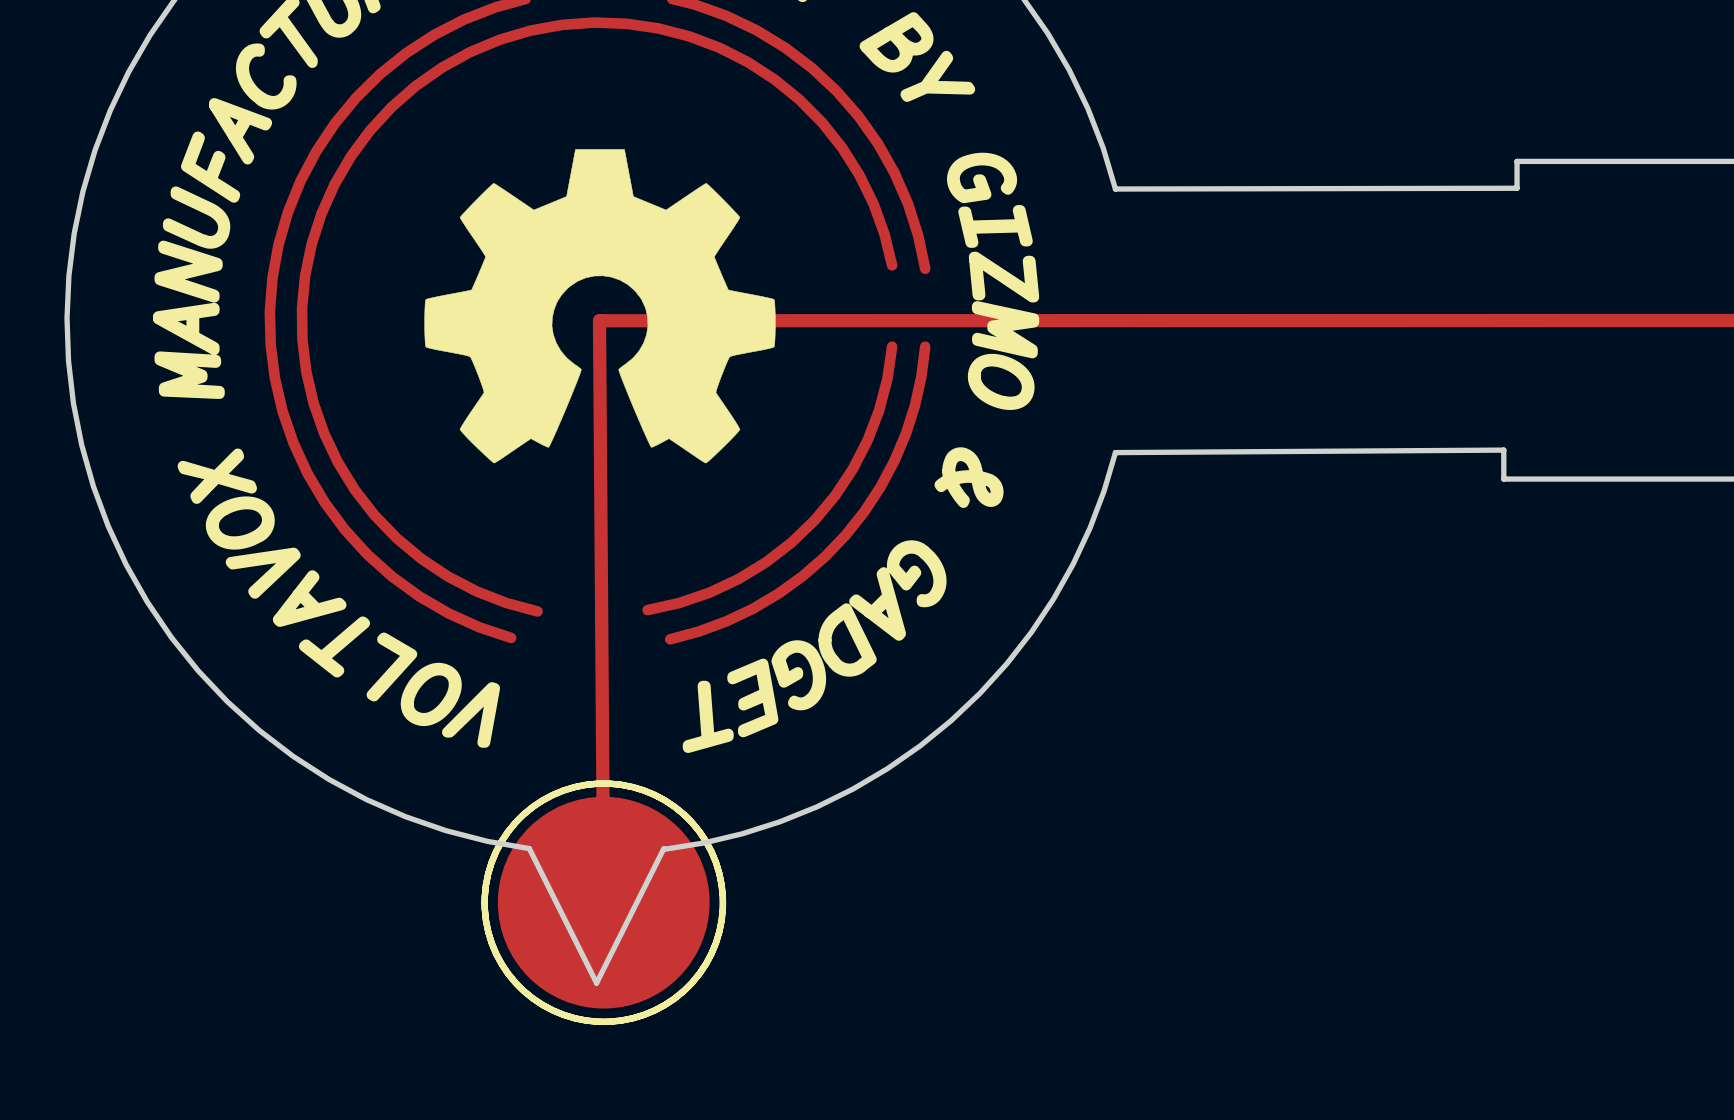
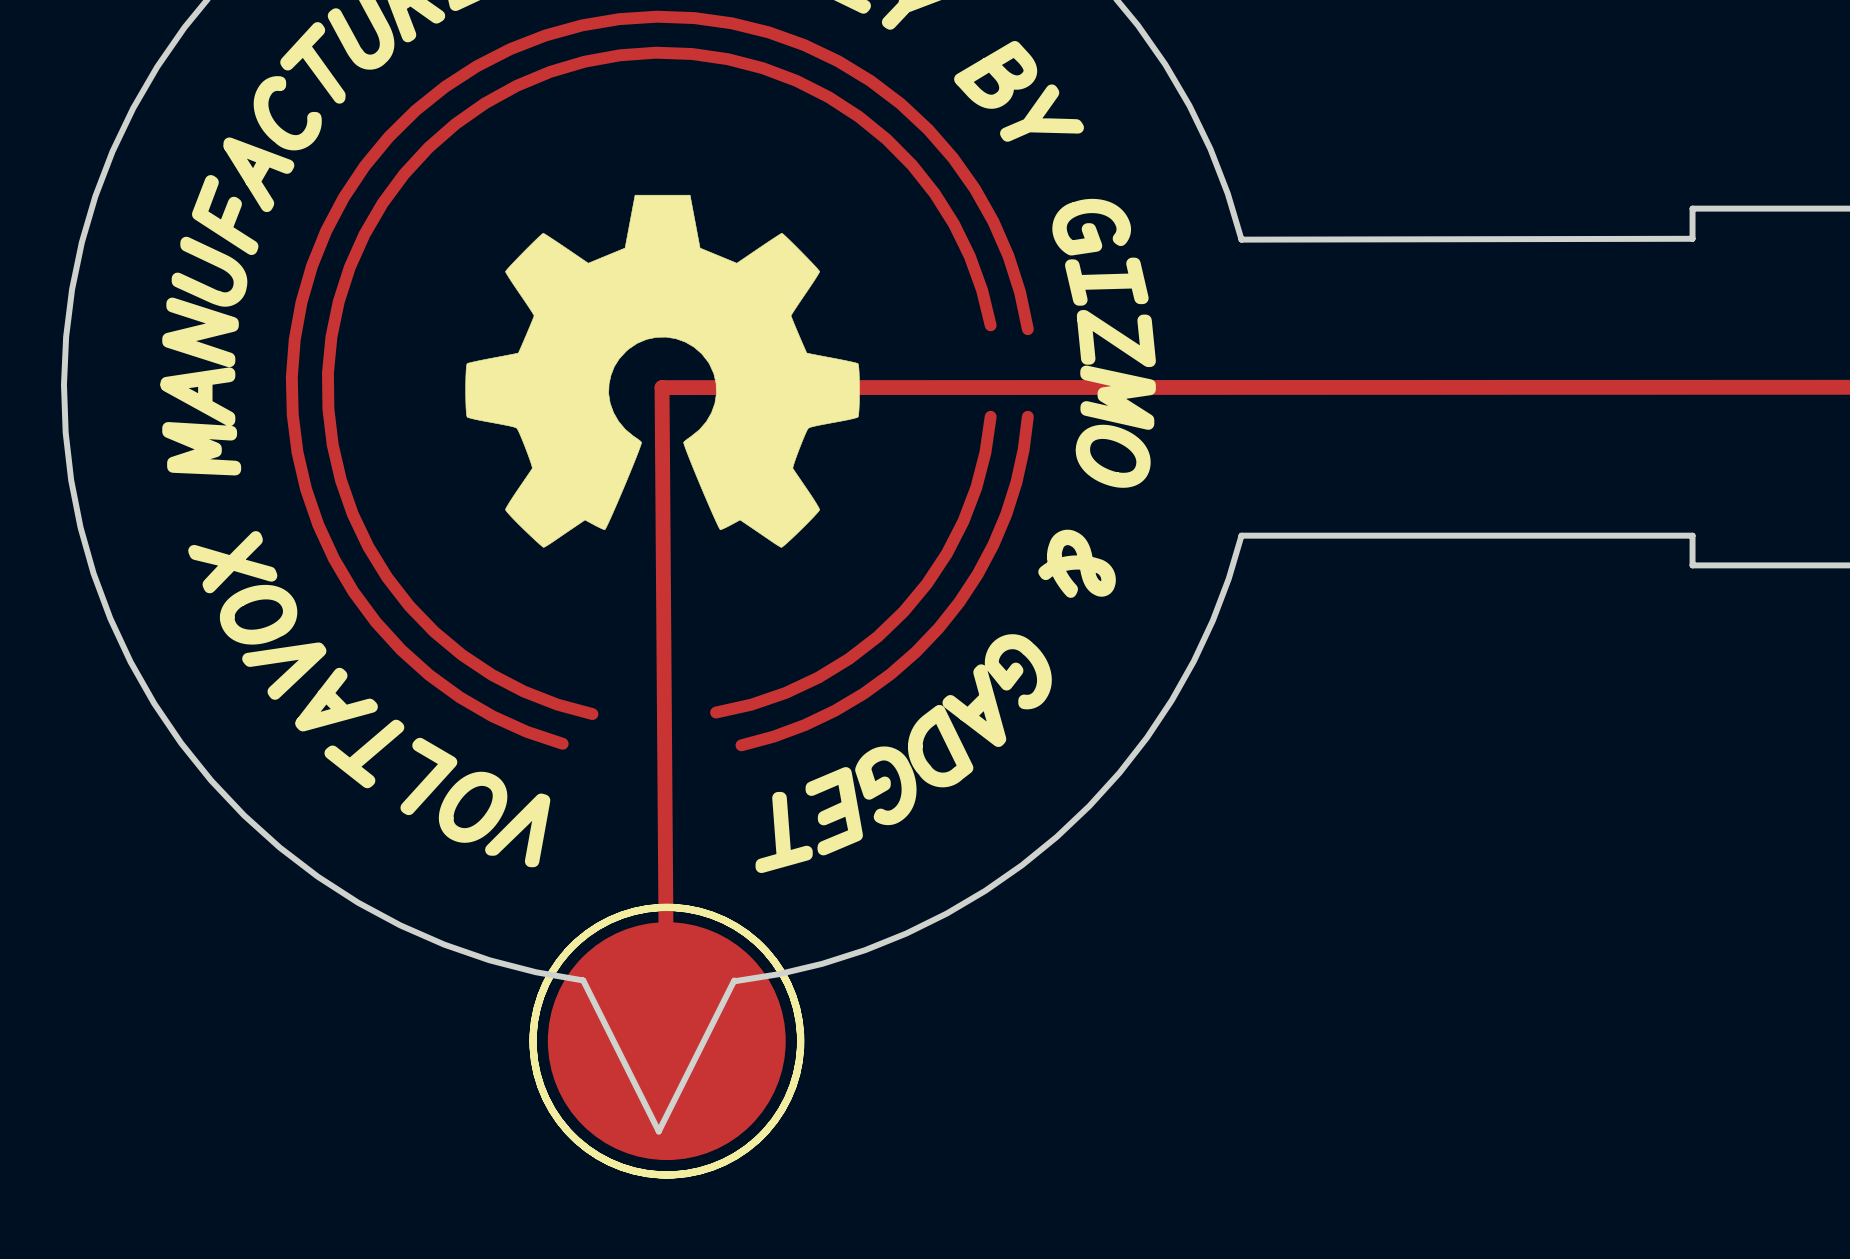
board edge: (1115, 452) (1503, 450) (1503, 479) (1517, 479) -> (1241, 535) (1692, 535) (1692, 565)

